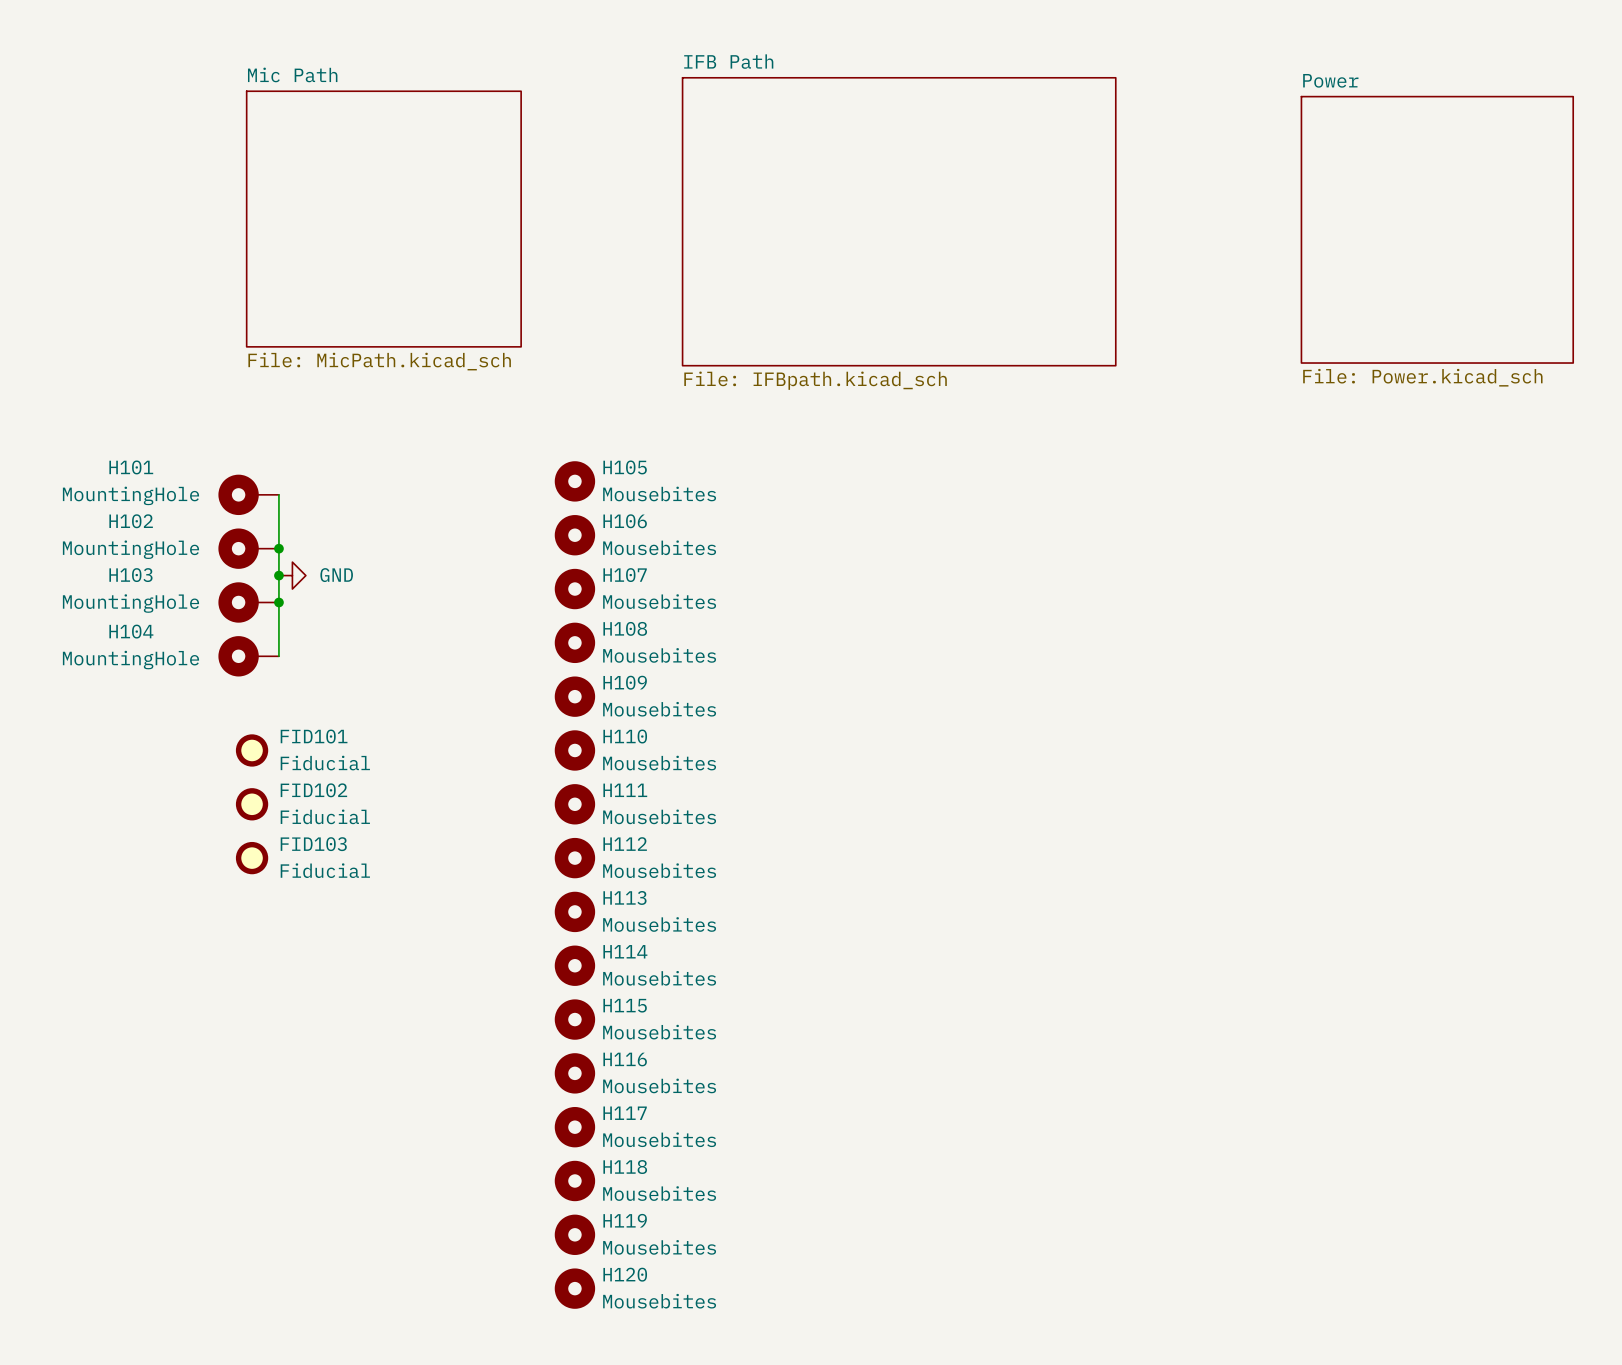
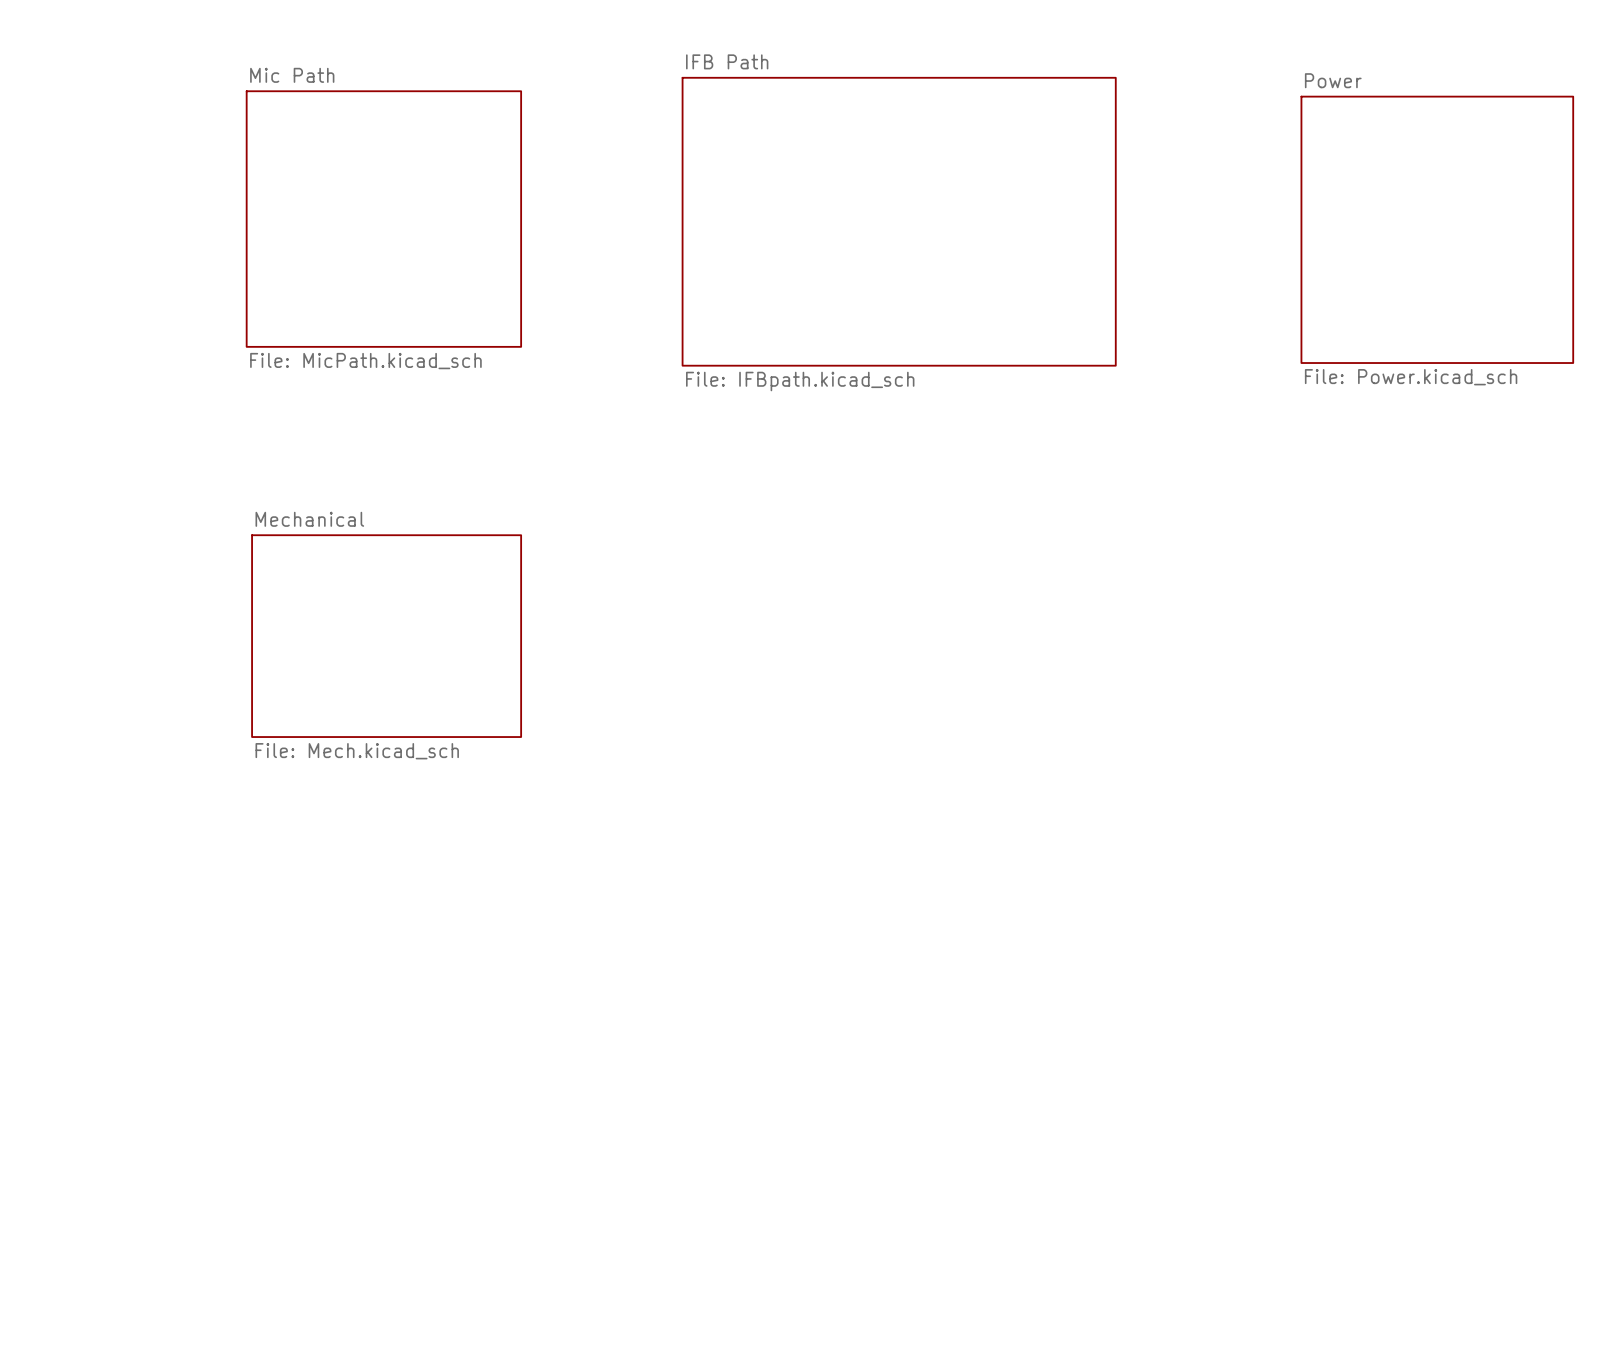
H105: Mousebites (574, 481) -> none
H101: MountingHole (248, 494) -> none
wire: (278, 494) (278, 656) -> none
H106: Mousebites (574, 535) -> none
H102: MountingHole (248, 548) -> none
junction: (278, 548) -> none
junction: (278, 575) -> none
power symbol: GND (292, 575) -> none
H107: Mousebites (574, 589) -> none
H103: MountingHole (248, 602) -> none
junction: (278, 602) -> none
sheet Mechanical: none -> File: Mech.kicad_sch (386, 636)
H108: Mousebites (574, 642) -> none
H104: MountingHole (248, 656) -> none
H109: Mousebites (574, 696) -> none
FID101: Fiducial (252, 750) -> none
H110: Mousebites (574, 750) -> none
FID102: Fiducial (252, 804) -> none
H111: Mousebites (574, 804) -> none
FID103: Fiducial (252, 858) -> none
H112: Mousebites (574, 858) -> none
H113: Mousebites (574, 911) -> none
H114: Mousebites (574, 965) -> none
H115: Mousebites (574, 1019) -> none
H116: Mousebites (574, 1073) -> none
H117: Mousebites (574, 1127) -> none
H118: Mousebites (574, 1180) -> none
H119: Mousebites (574, 1234) -> none
H120: Mousebites (574, 1288) -> none

